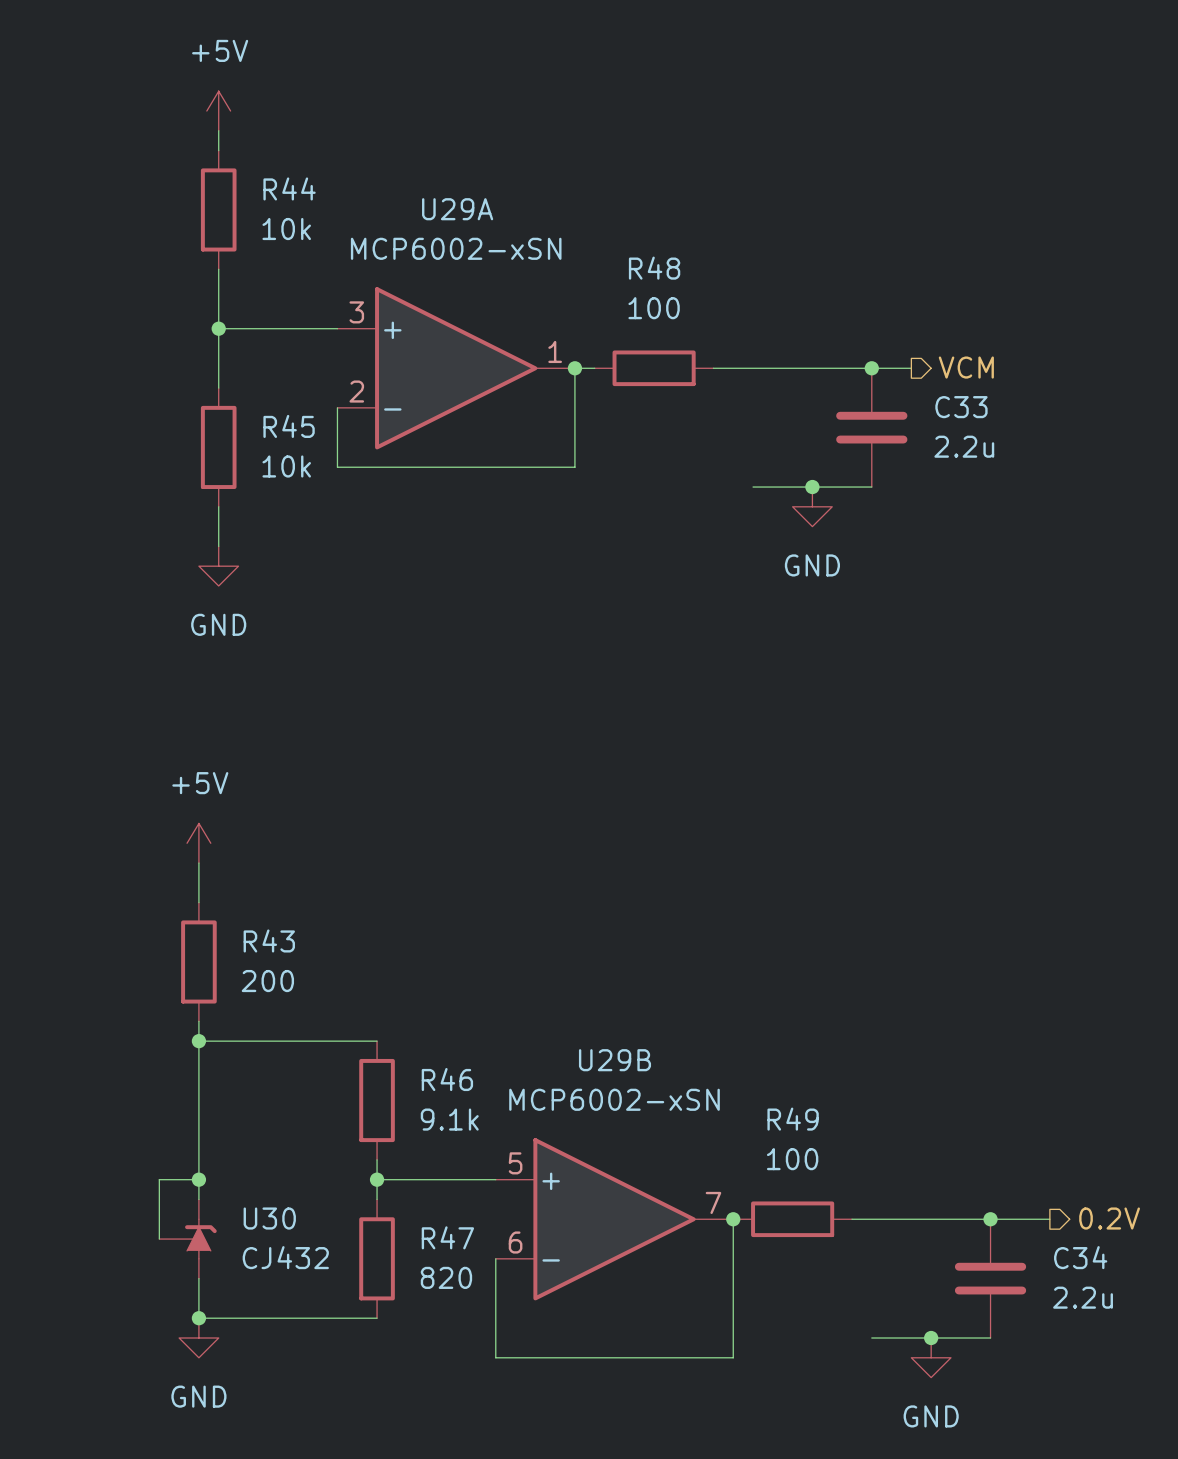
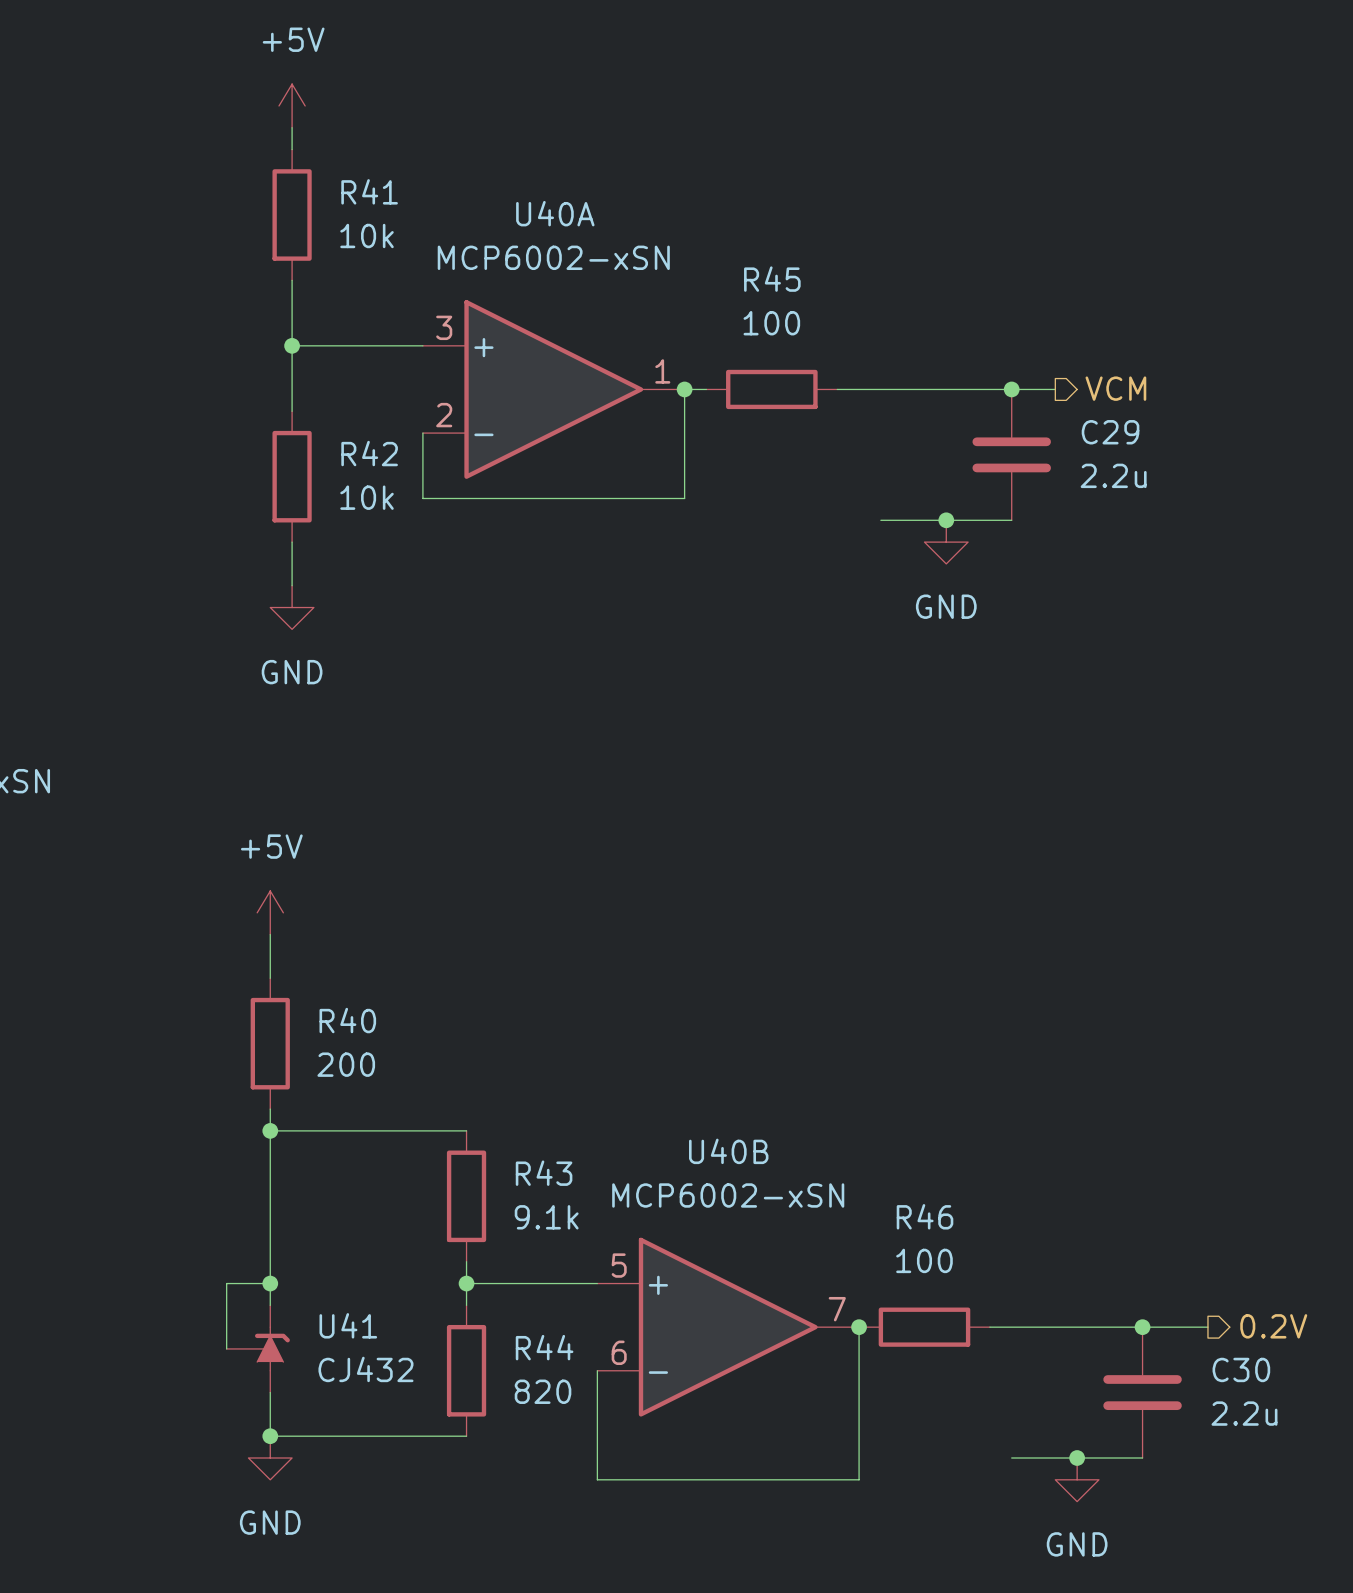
R44 name: R44 (289, 188) -> R41 (369, 191)
U29A name: U29A (457, 209) -> U40A (555, 213)
R48 name: R48 (654, 268) -> R45 (772, 279)
C33 name: C33 (961, 407) -> C29 (1110, 432)
R45 name: R45 (289, 426) -> R42 (369, 453)
R43 name: R43 (269, 940) -> R40 (347, 1020)
U29B name: U29B (614, 1060) -> U40B (728, 1151)
R46 name: R46 (447, 1079) -> R43 (544, 1173)
R49 name: R49 (793, 1119) -> R46 (925, 1216)
U30 name: U30 (269, 1218) -> U41 (348, 1325)
R47 name: R47 (447, 1237) -> R44 (544, 1347)
C34 name: C34 (1080, 1257) -> C30 (1241, 1369)

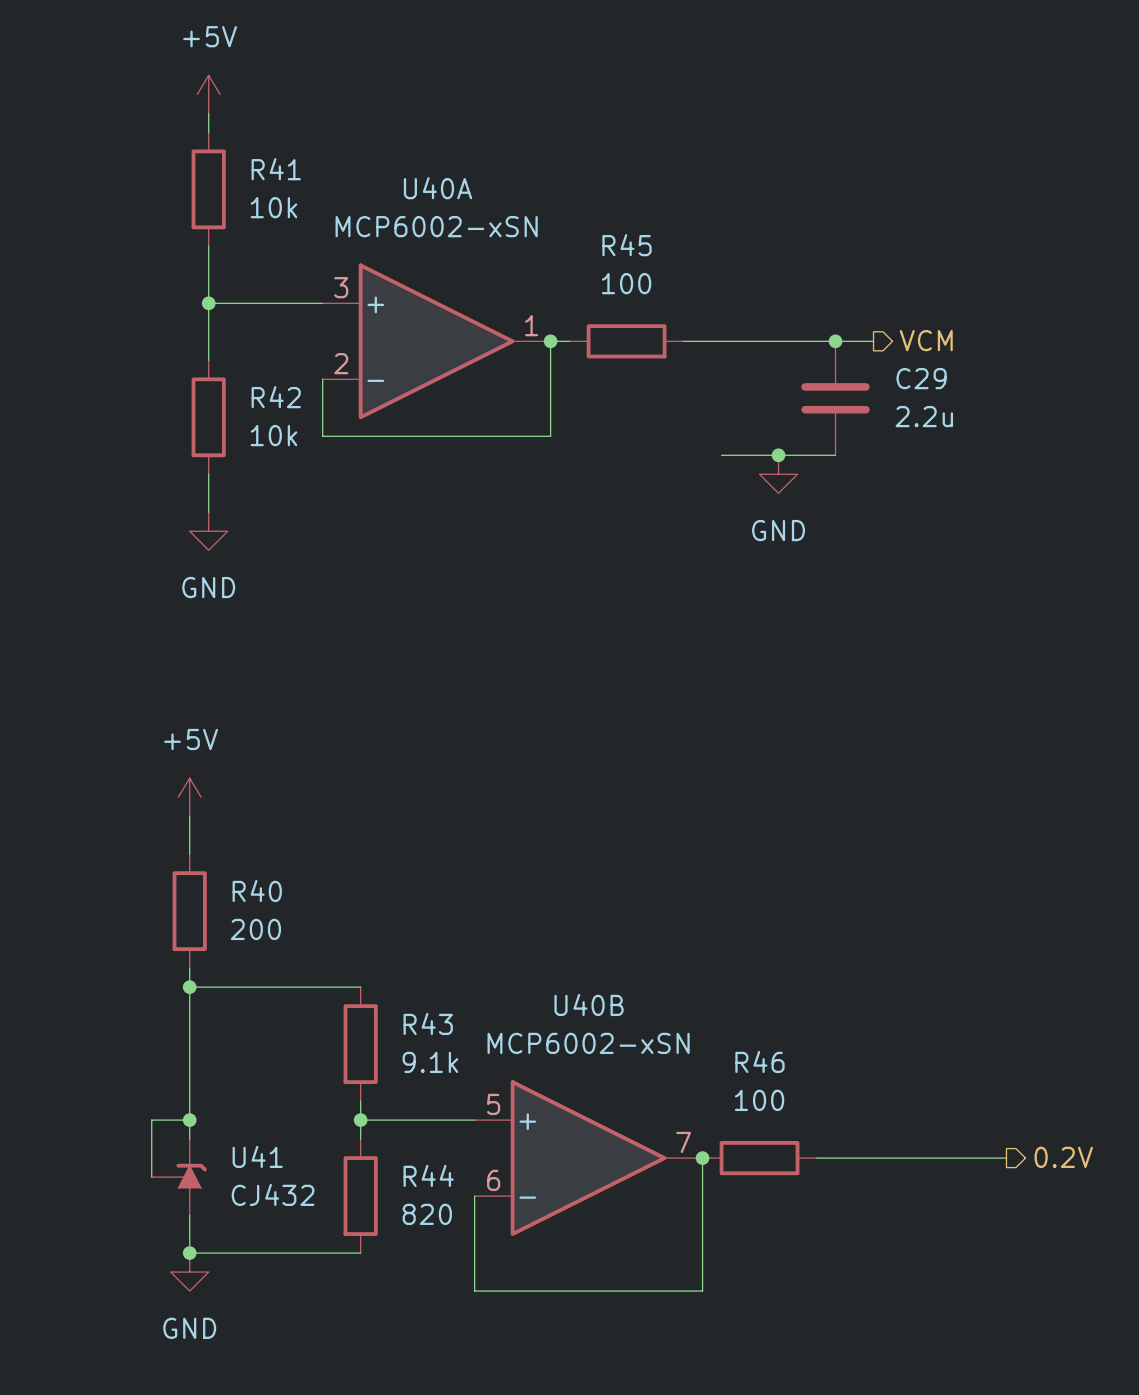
junction: (1142, 1327) -> none
C30: 2.2u (1142, 1392) -> none
wire: (1011, 1458) (1142, 1458) -> none
junction: (1077, 1458) -> none
power symbol: GND (1077, 1479) -> none

